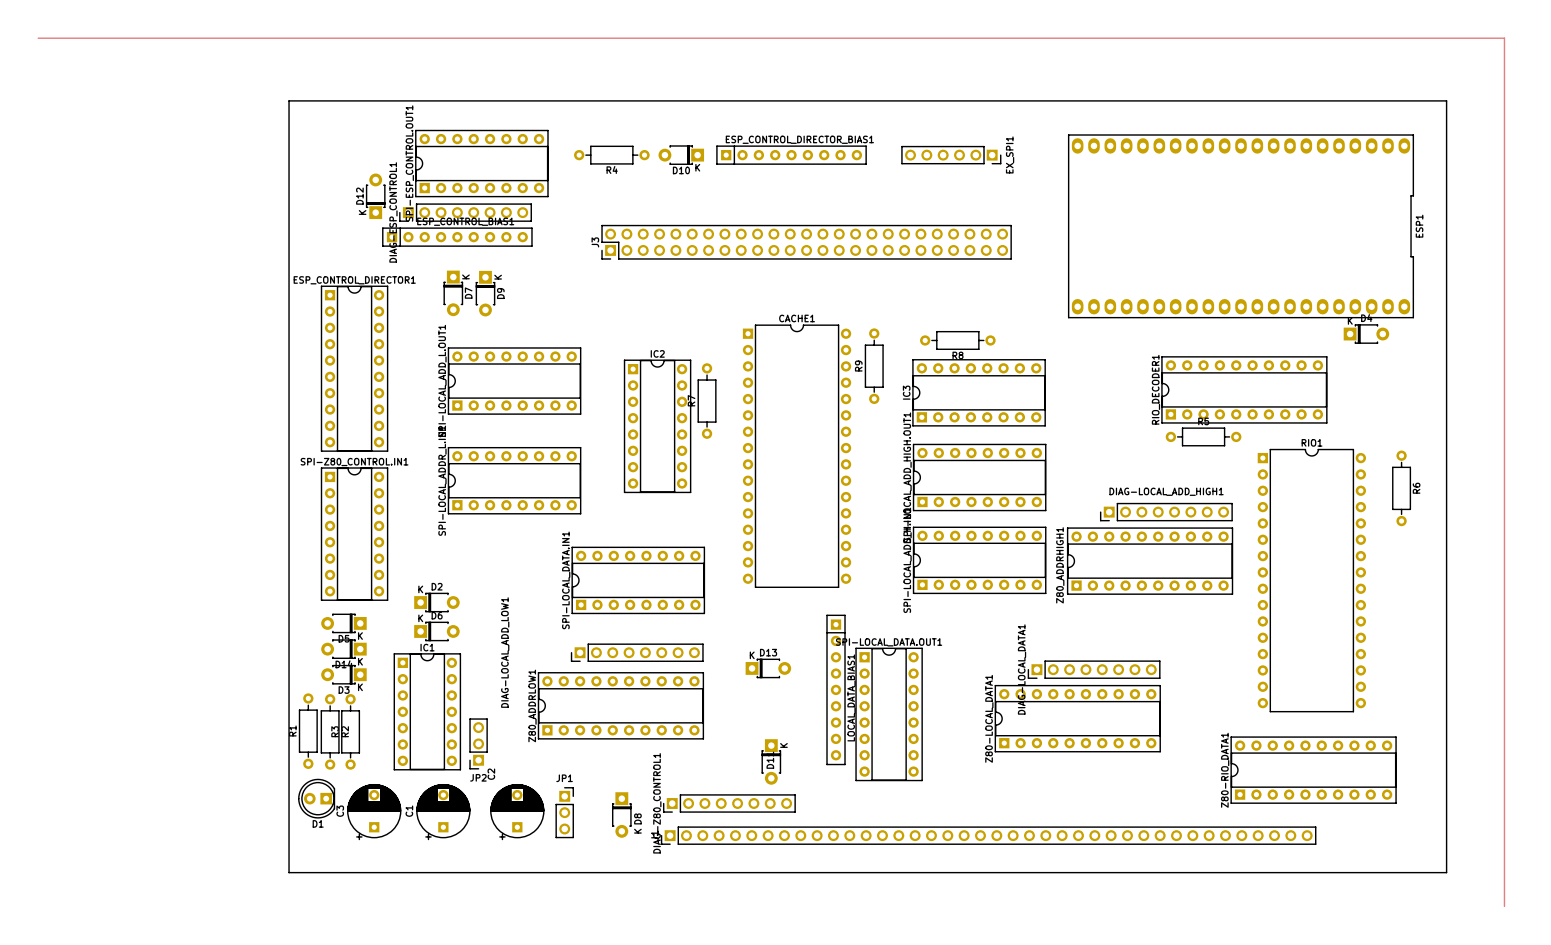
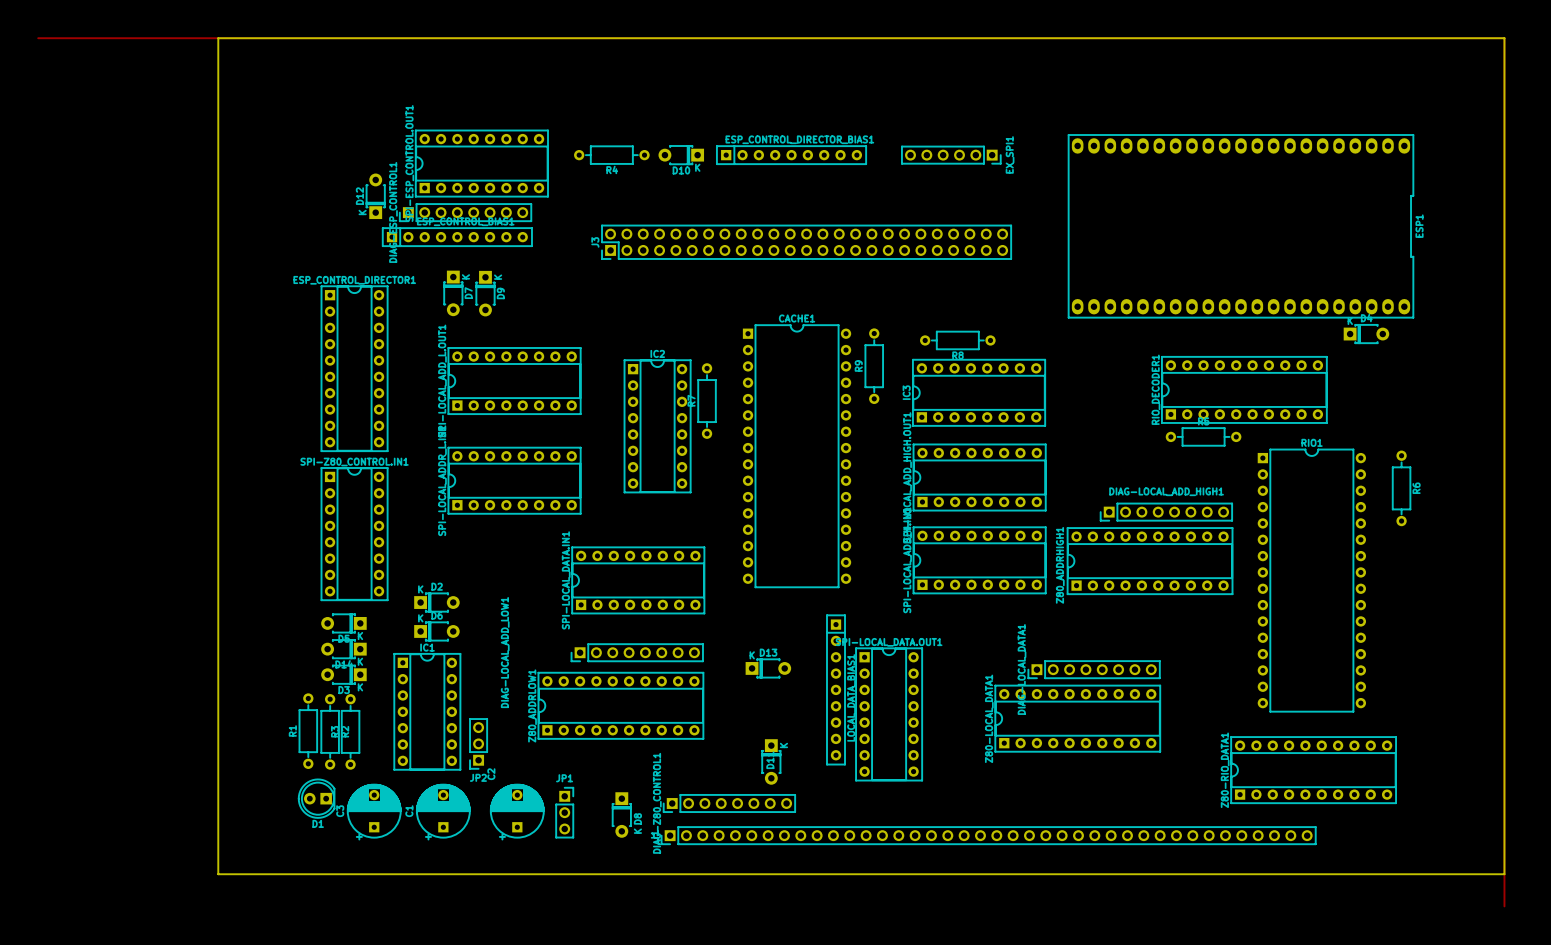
board edge: (289, 100) (1446, 100) (1446, 872) (289, 872) (289, 100) -> (218, 38) (218, 874) (1504, 874) (1504, 38) (218, 38)

